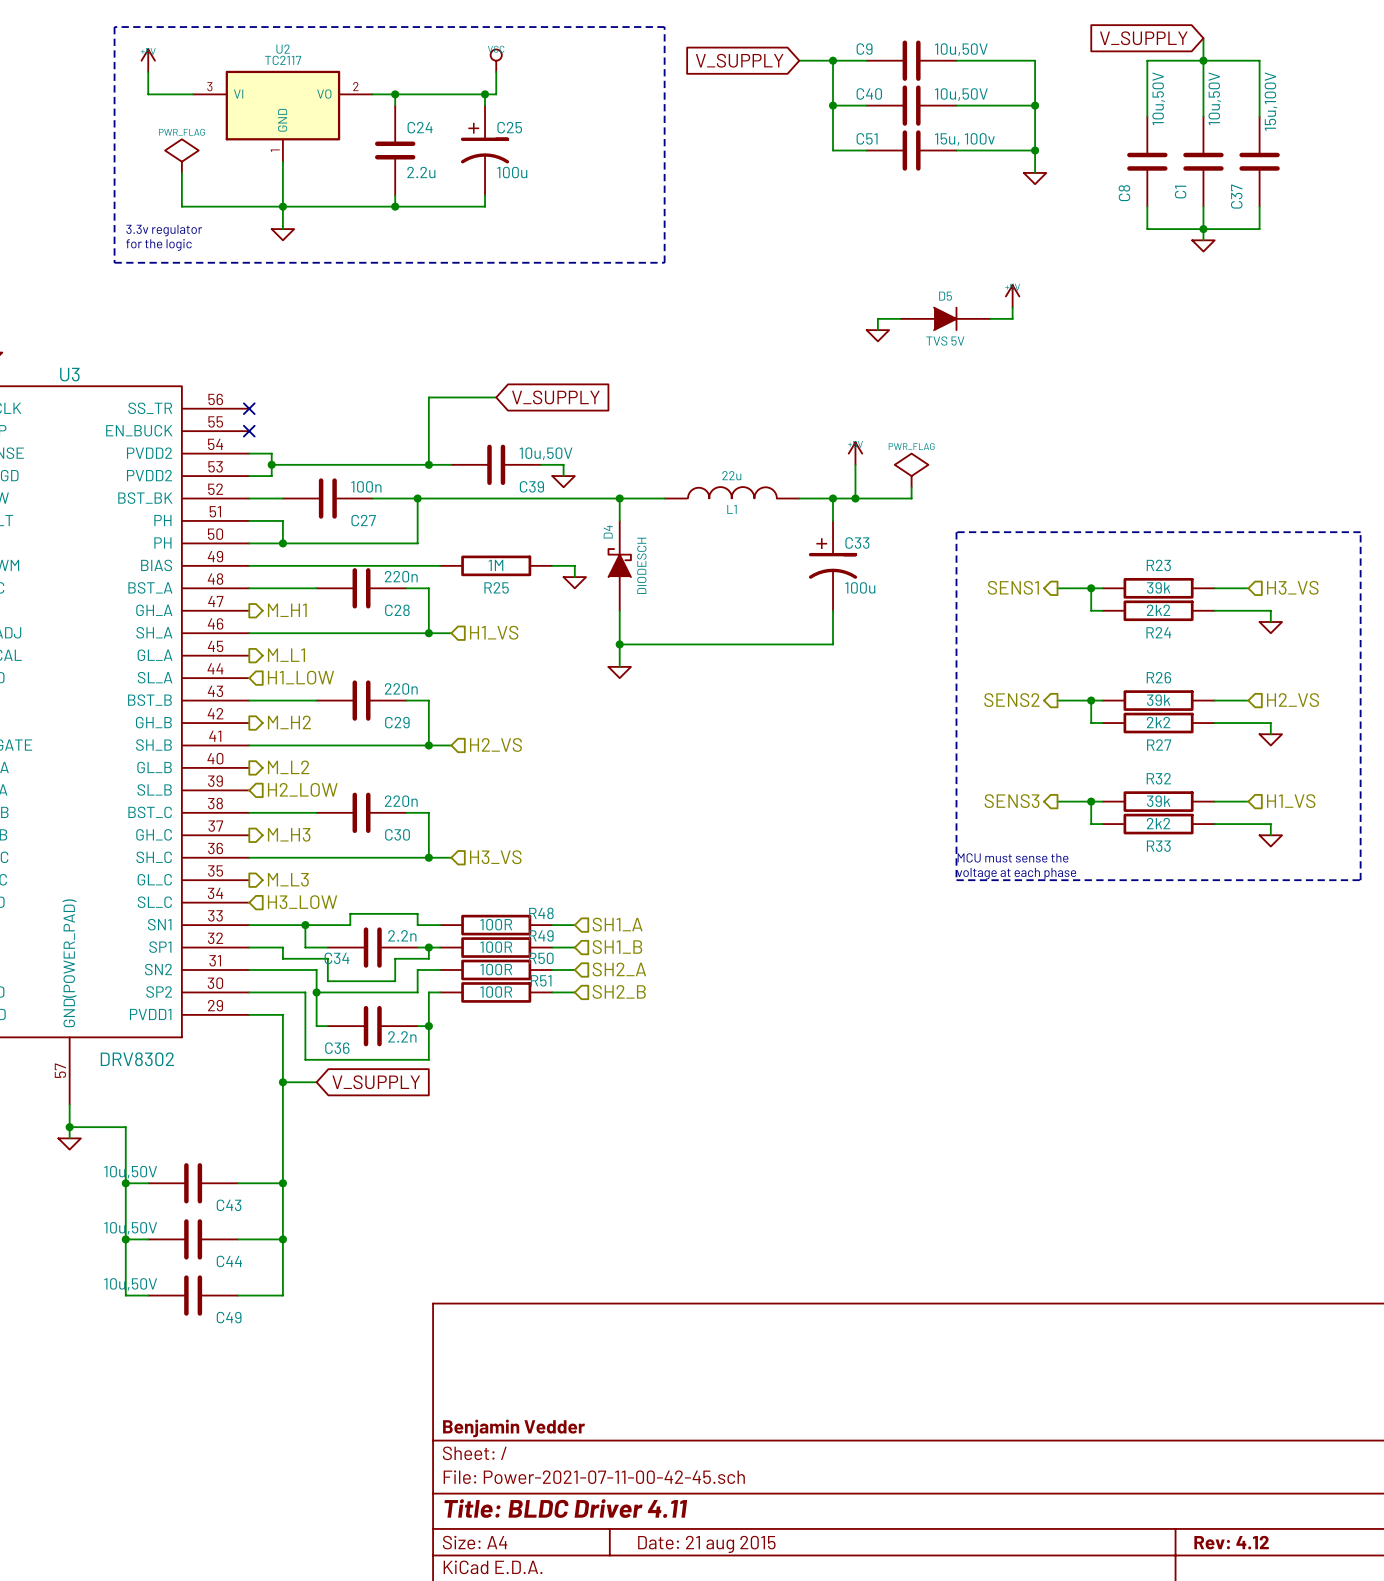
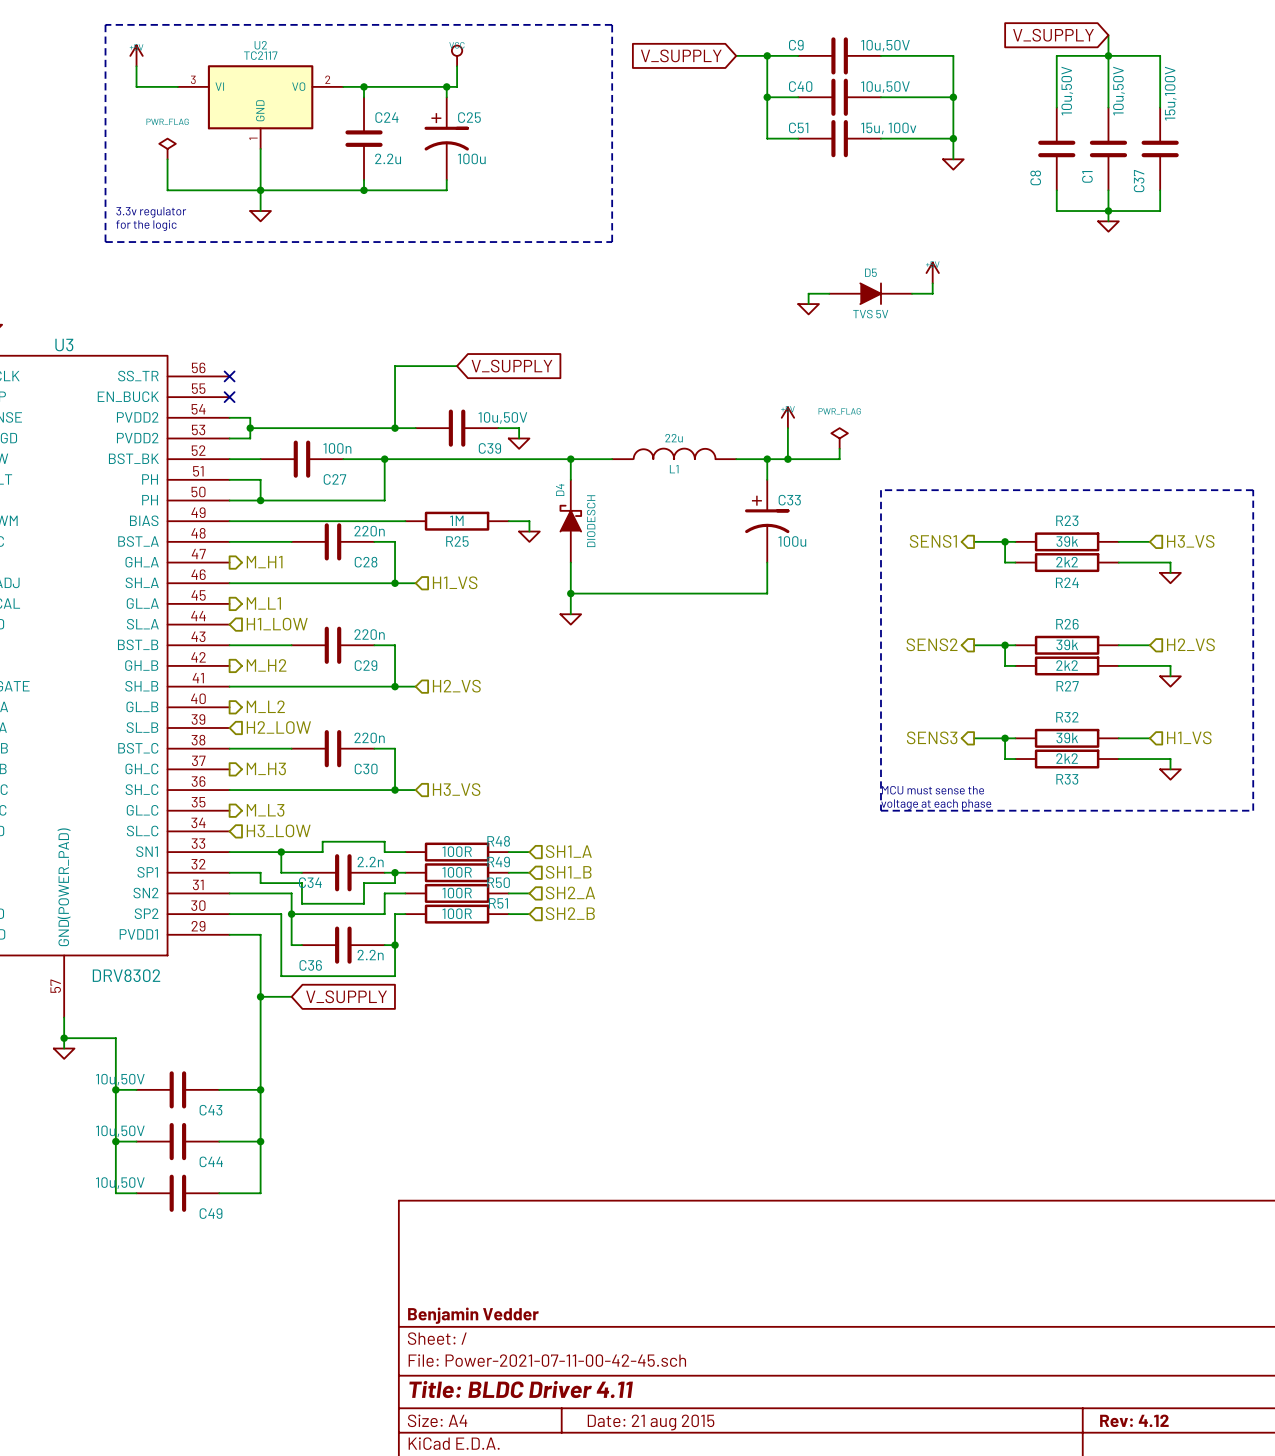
power symbol shape: [165, 139, 199, 173] -> [159, 138, 176, 160]
power symbol shape: [894, 453, 929, 488] -> [831, 428, 848, 449]

